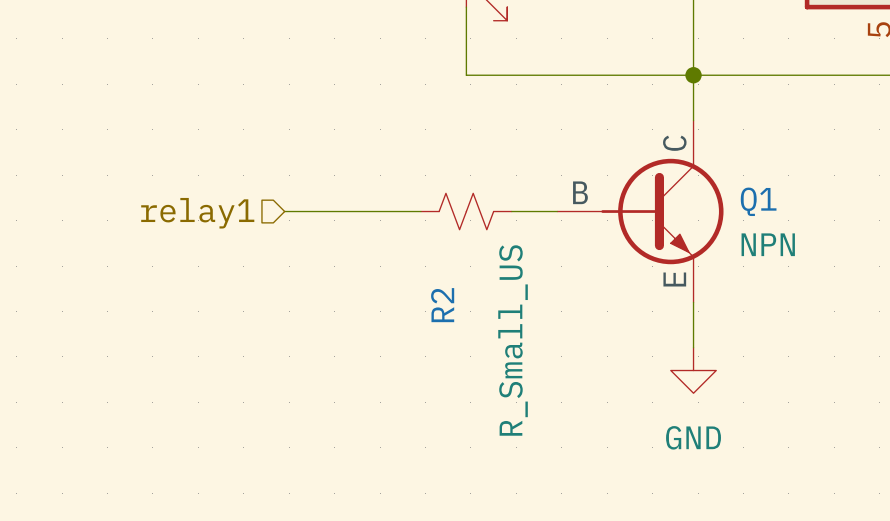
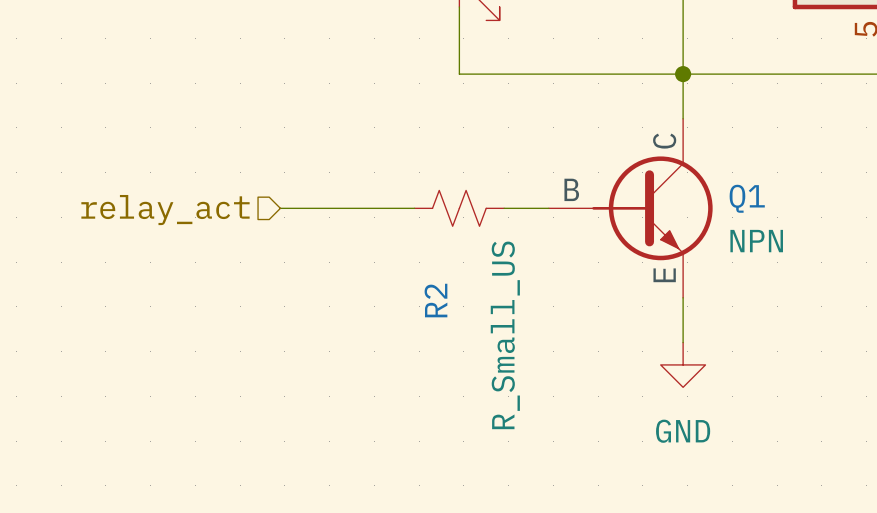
hierarchical label: relay1 (197, 213) -> relay_act (165, 210)

